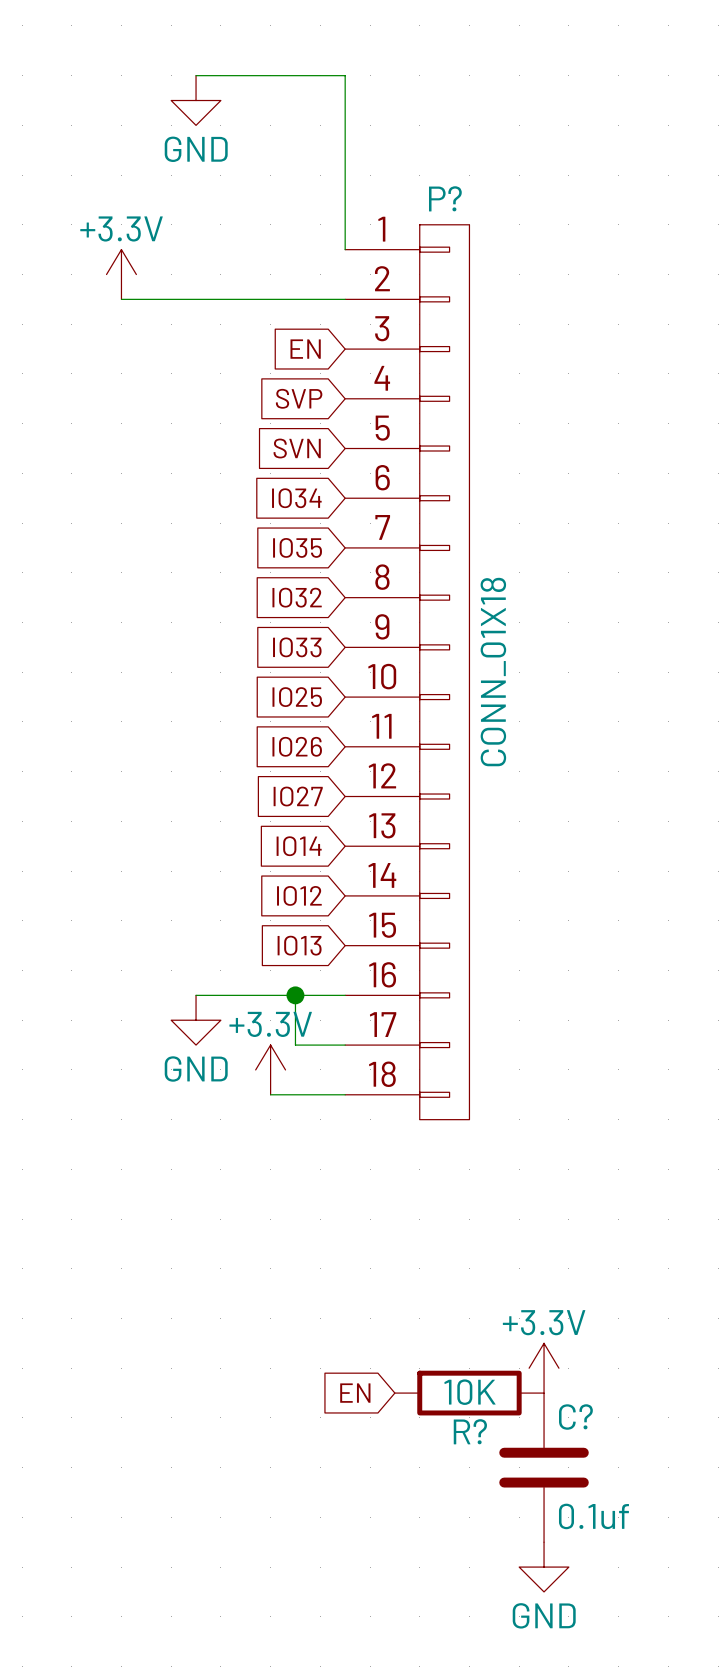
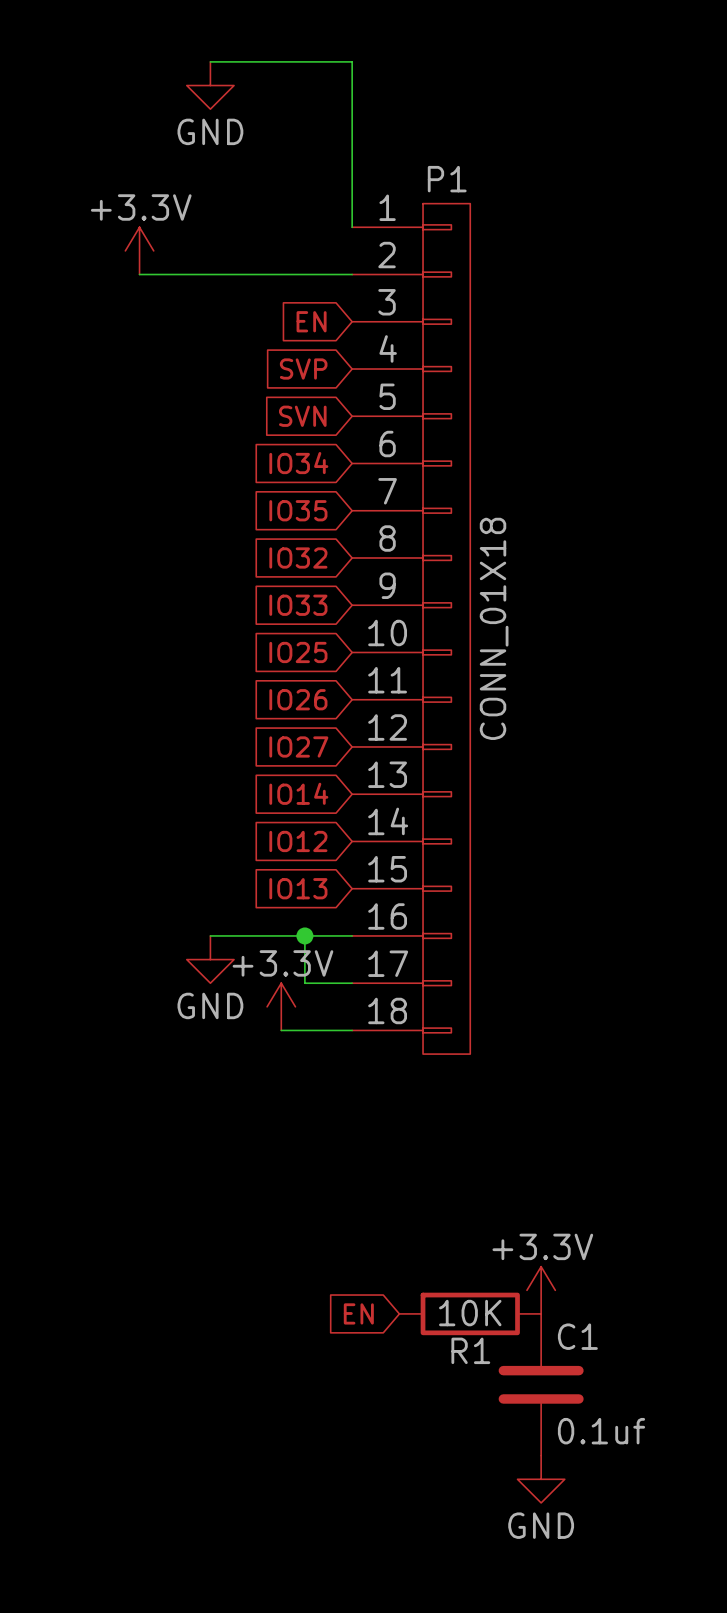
P? name: P? (445, 198) -> P1 (447, 179)
C? name: C? (575, 1417) -> C1 (577, 1336)
R? name: R? (470, 1431) -> R1 (470, 1350)

